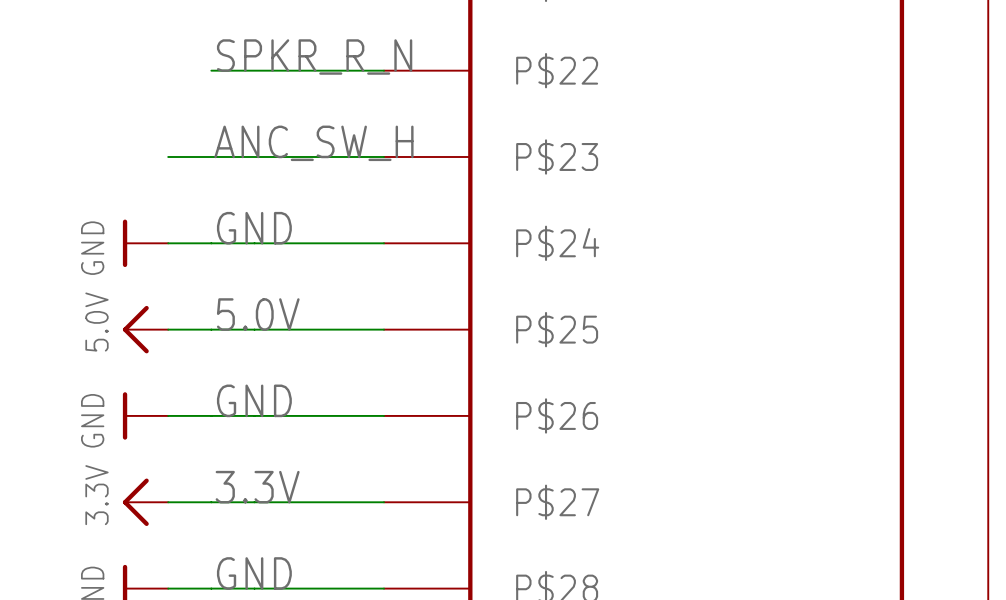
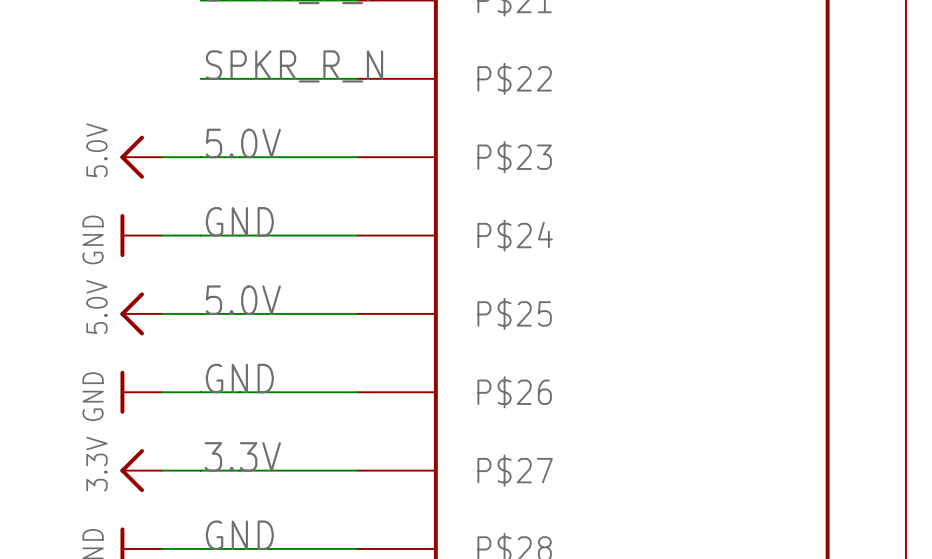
label: ANC_SW_H (313, 143) -> 5.0V (243, 143)
power symbol: none -> 5.0V (141, 157)

